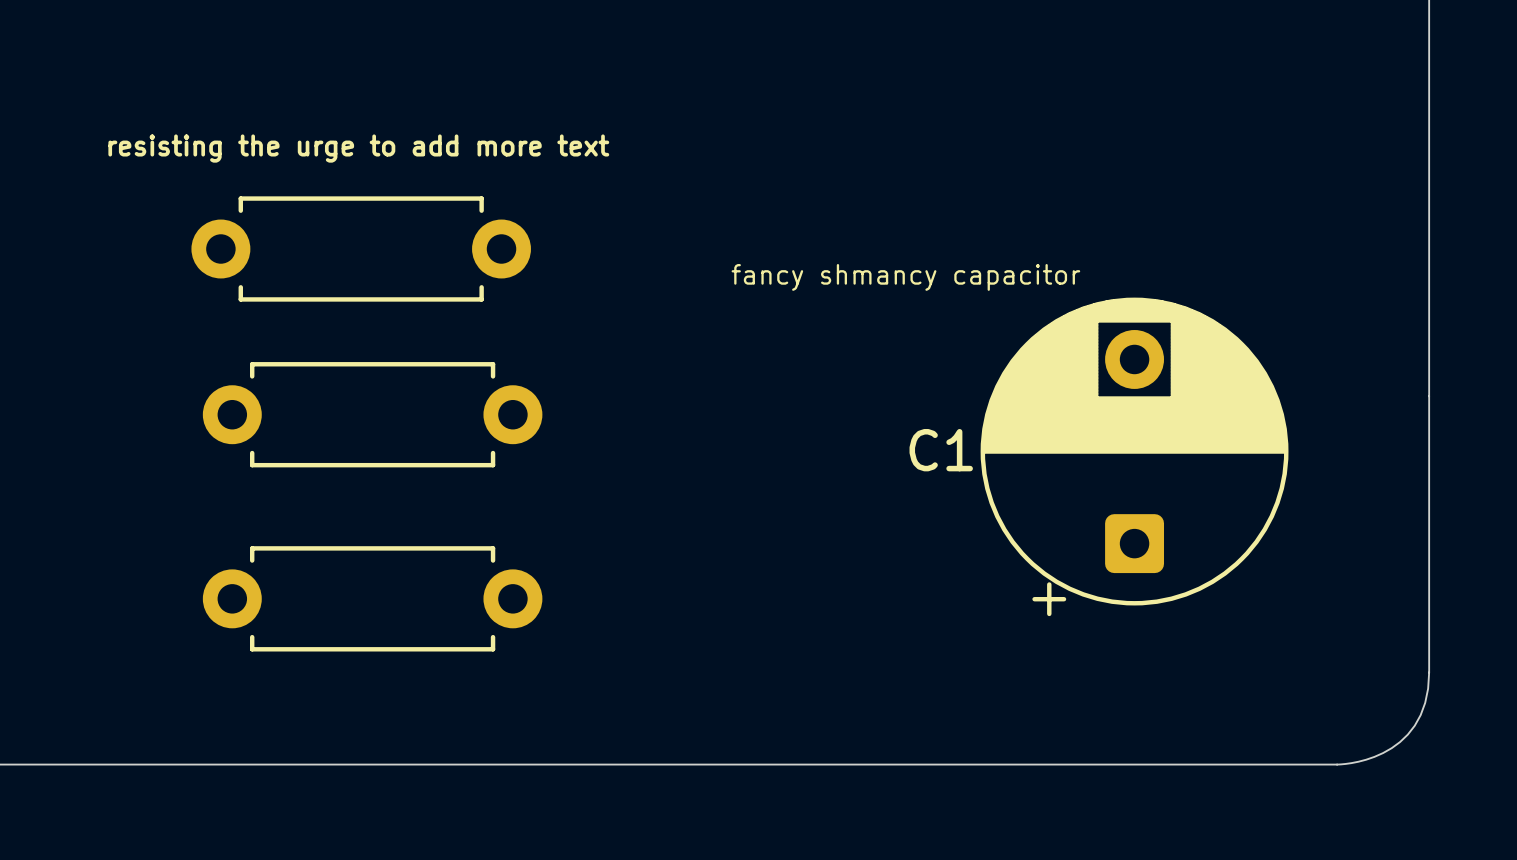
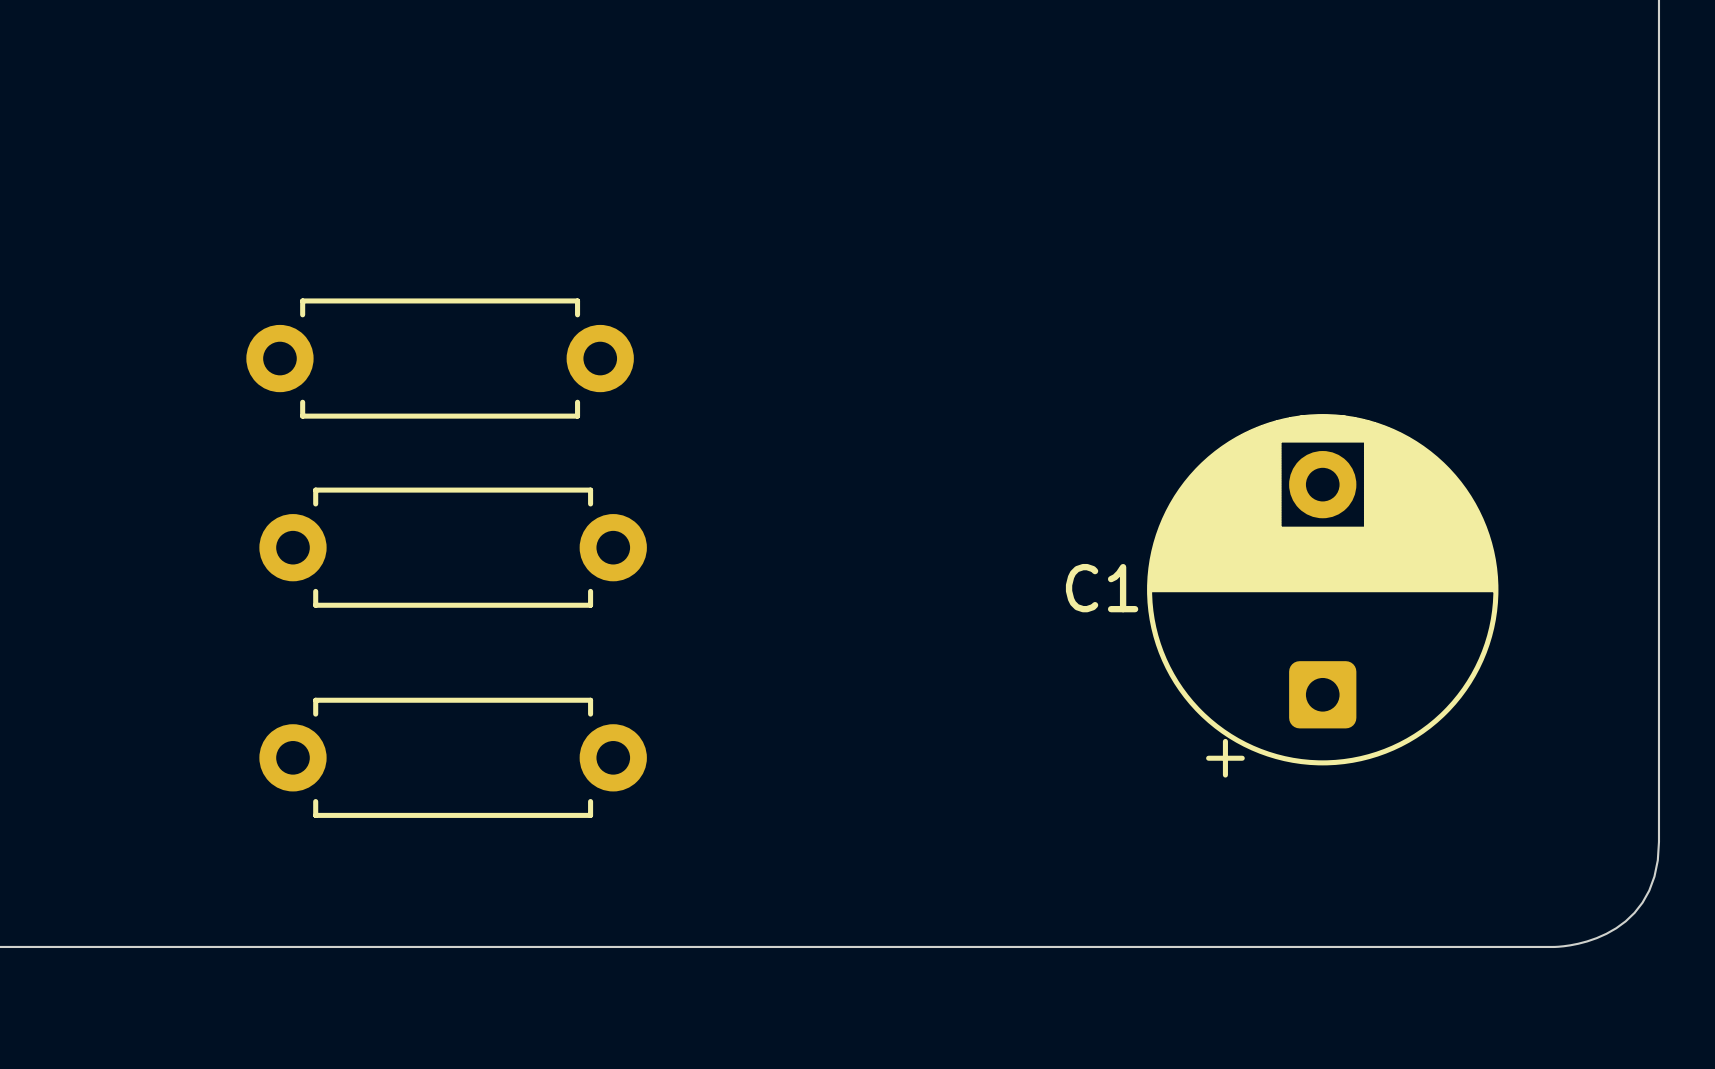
text: resisting the urge to add more text (358, 148) -> none
text: fancy shmancy capacitor (905, 277) -> none

